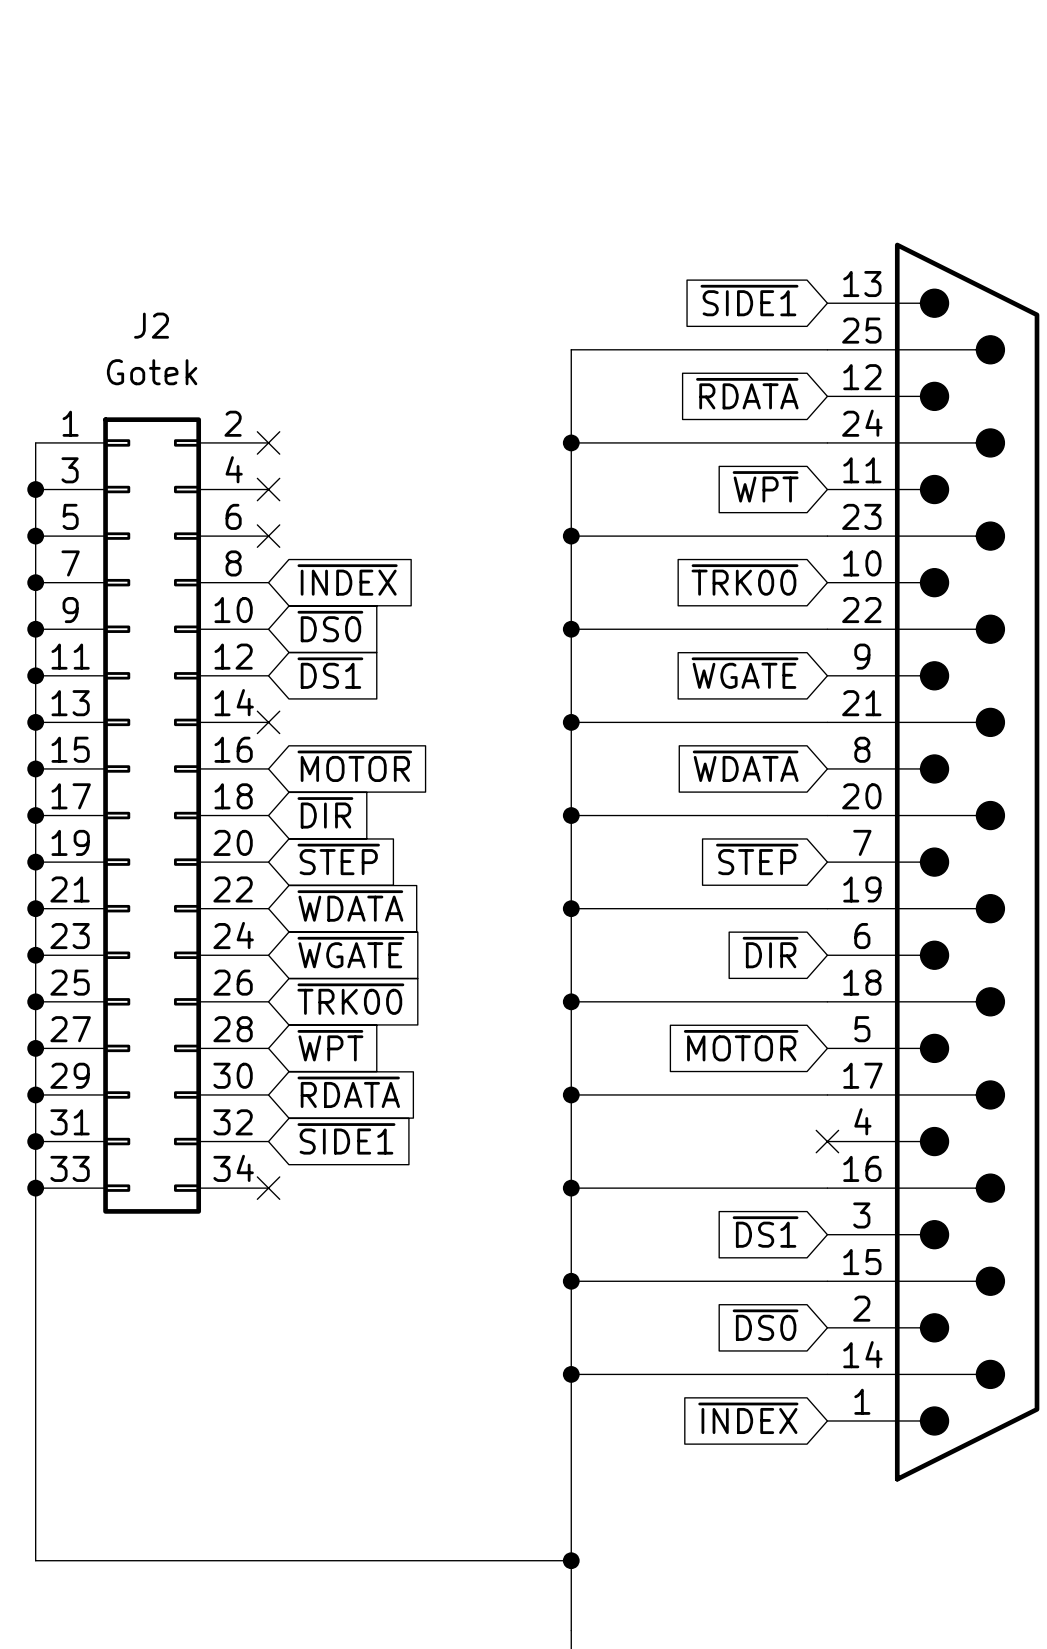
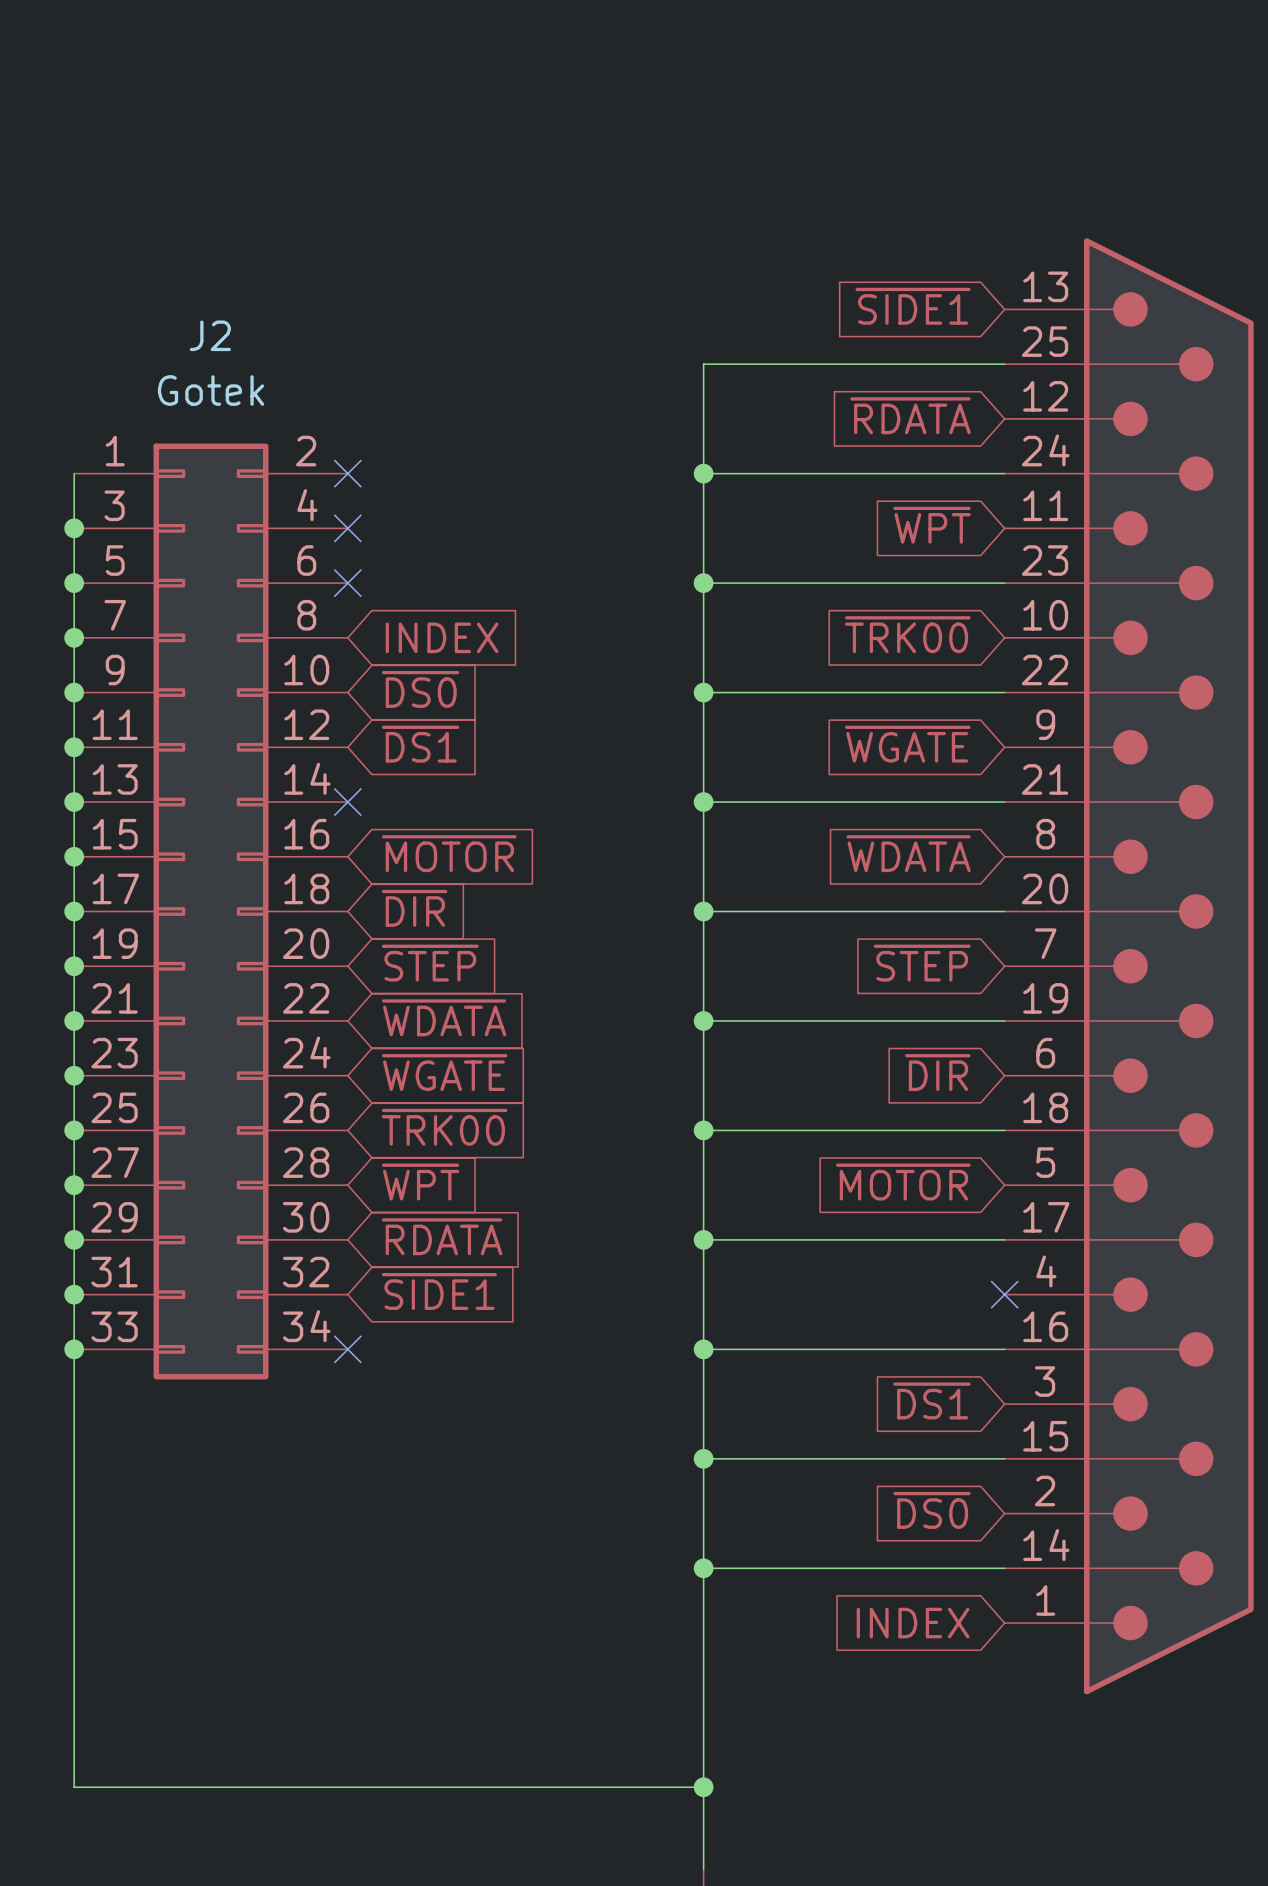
global label: ~{INDEX} (347, 579) -> INDEX (442, 637)
global label: ~{INDEX} (748, 1418) -> INDEX (913, 1623)

